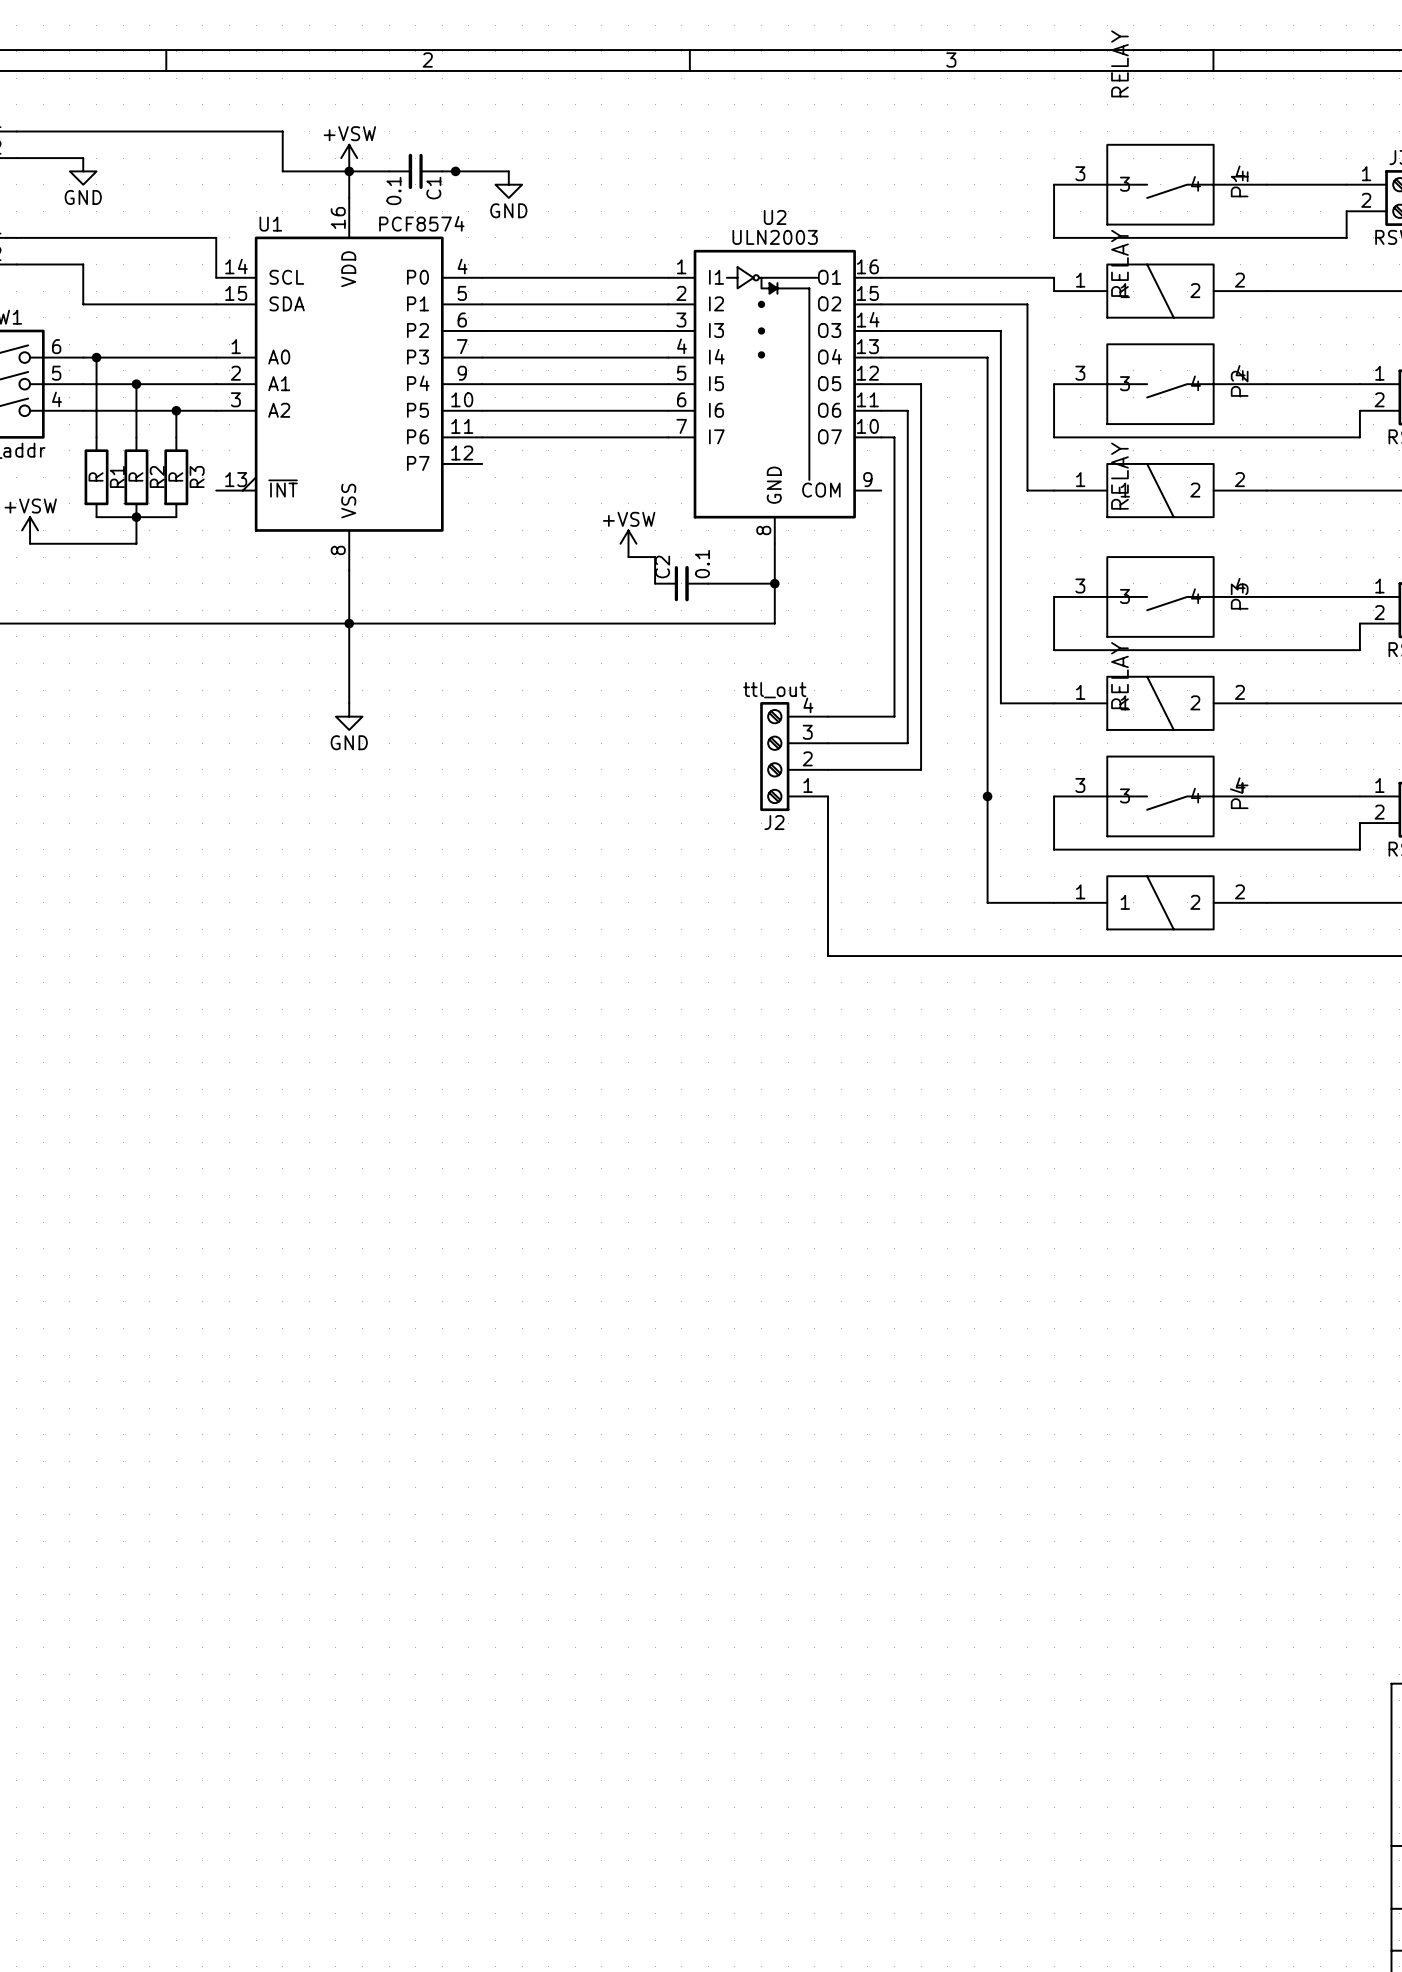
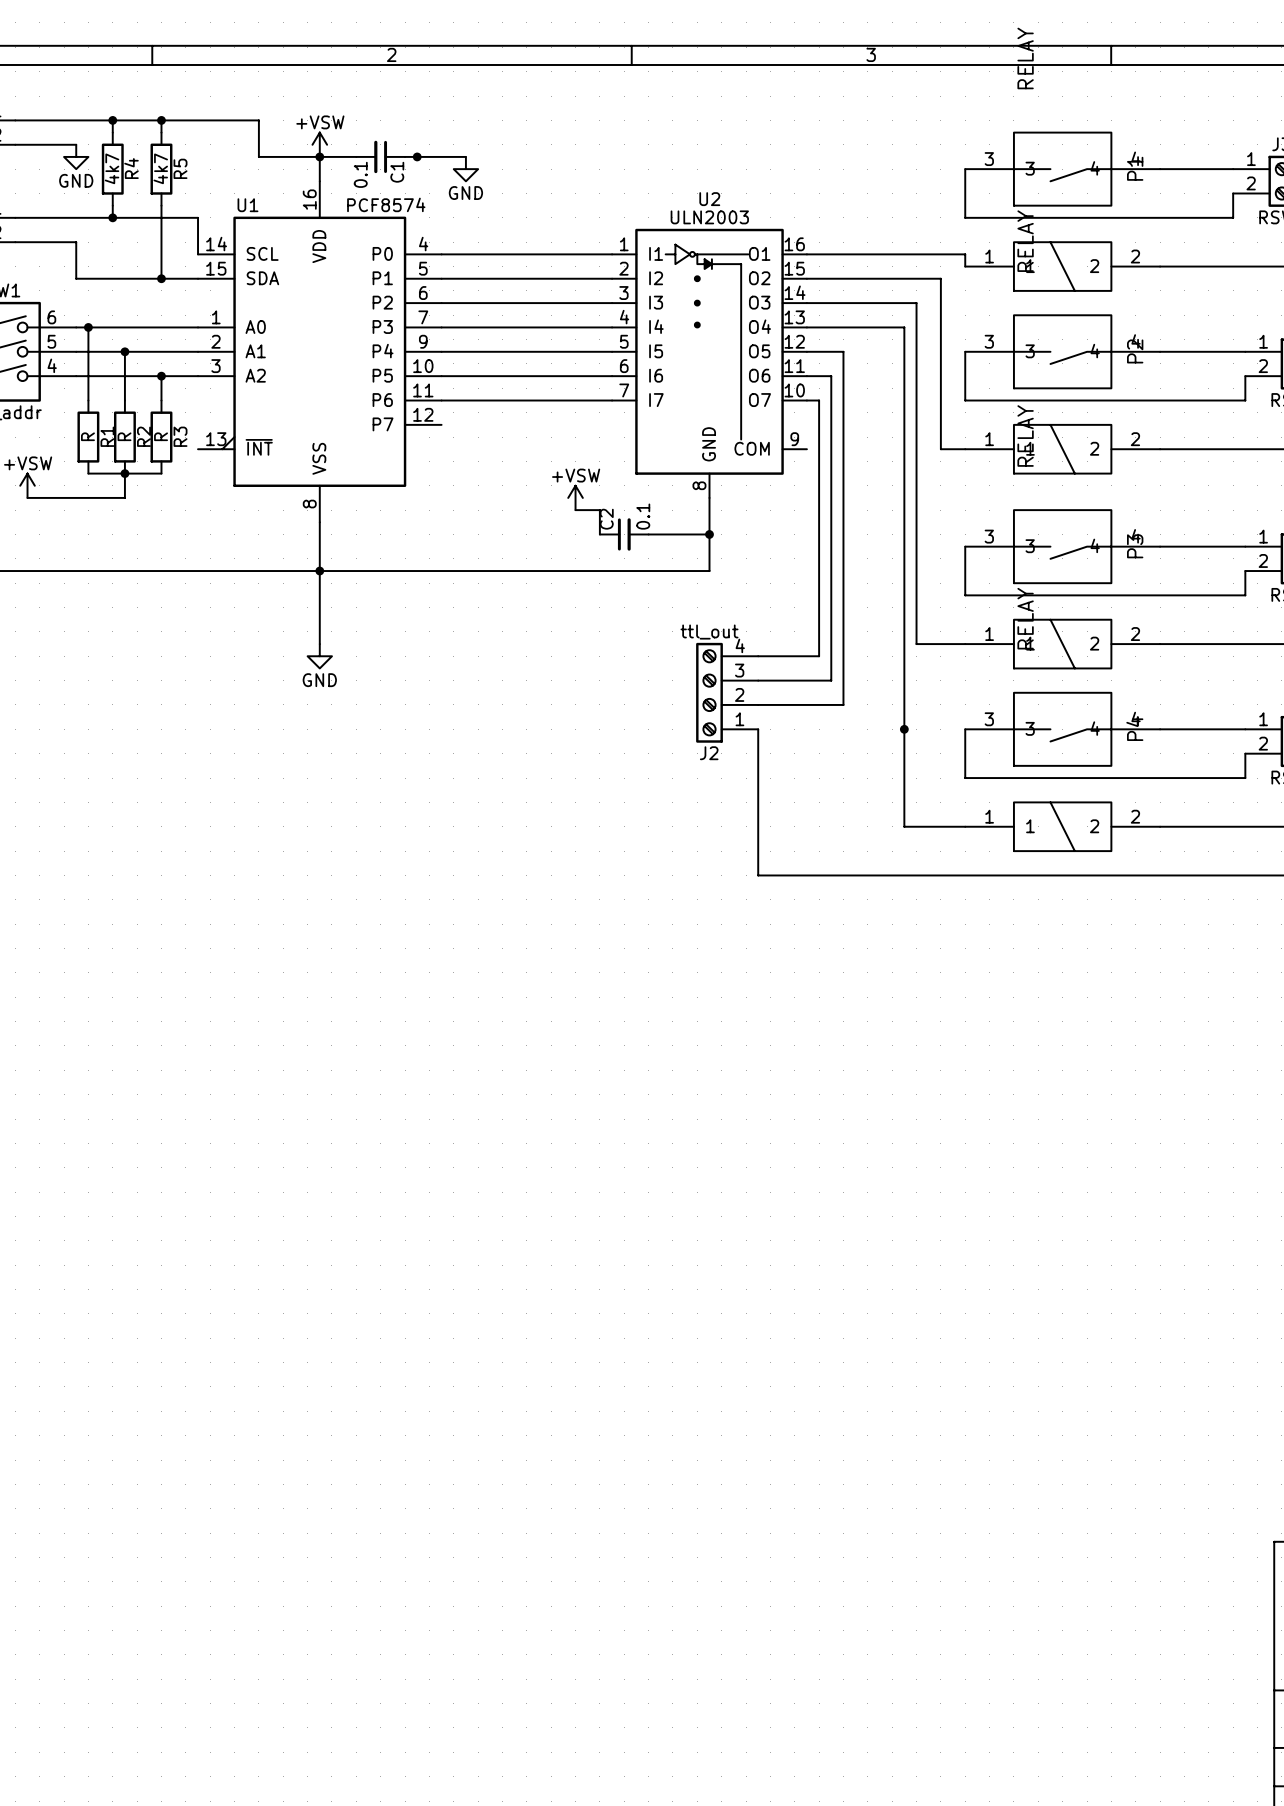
wire: none -> (112, 120) (112, 132)
junction: none -> (112, 120)
wire: none -> (161, 120) (161, 132)
junction: none -> (161, 120)
R4: none -> 4k7 (112, 169)
R5: none -> 4k7 (161, 169)
wire: none -> (112, 205) (112, 217)
wire: none -> (161, 205) (161, 278)
junction: none -> (112, 217)
junction: none -> (161, 278)

